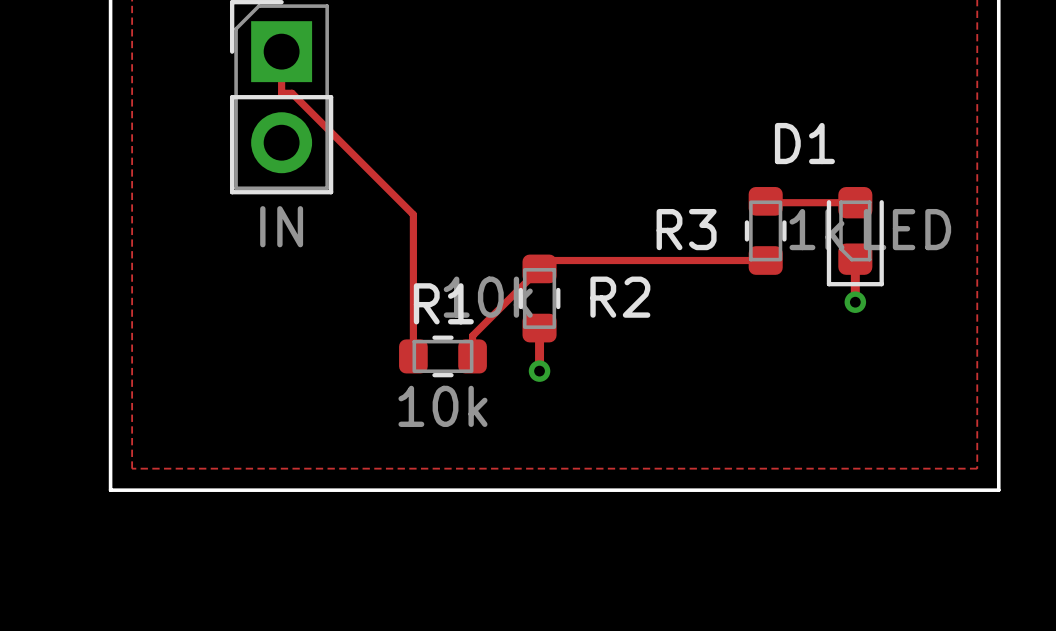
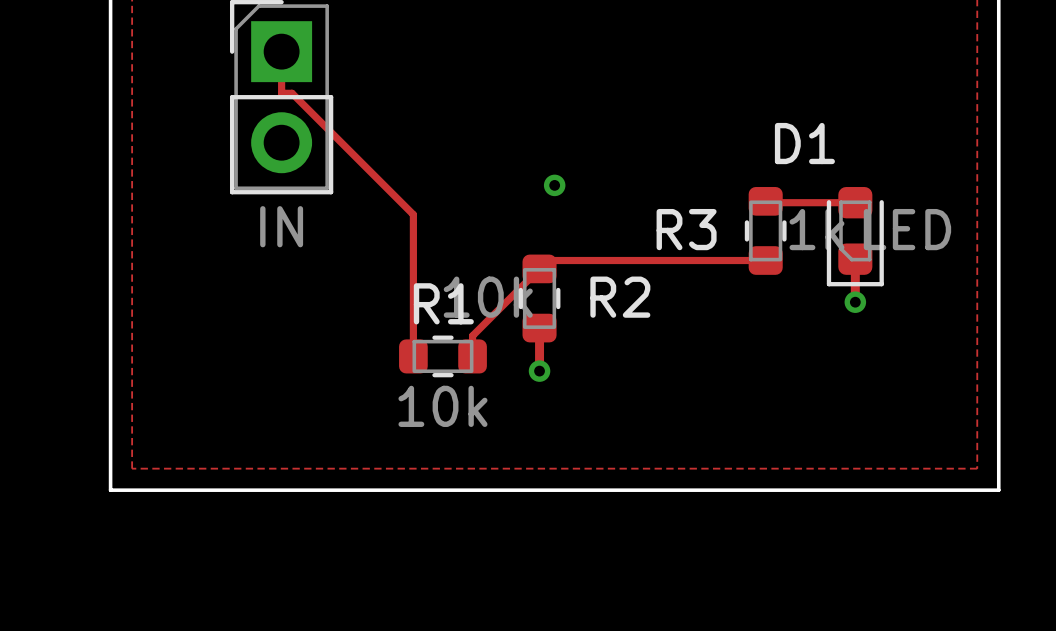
via: none -> (554, 185)

